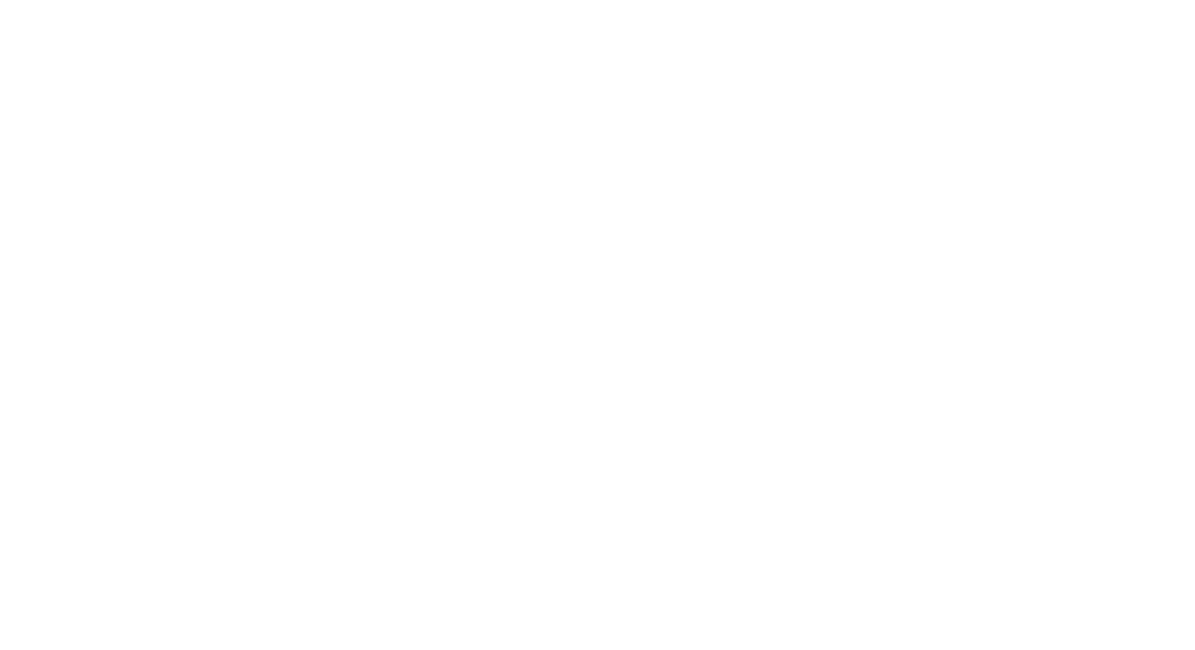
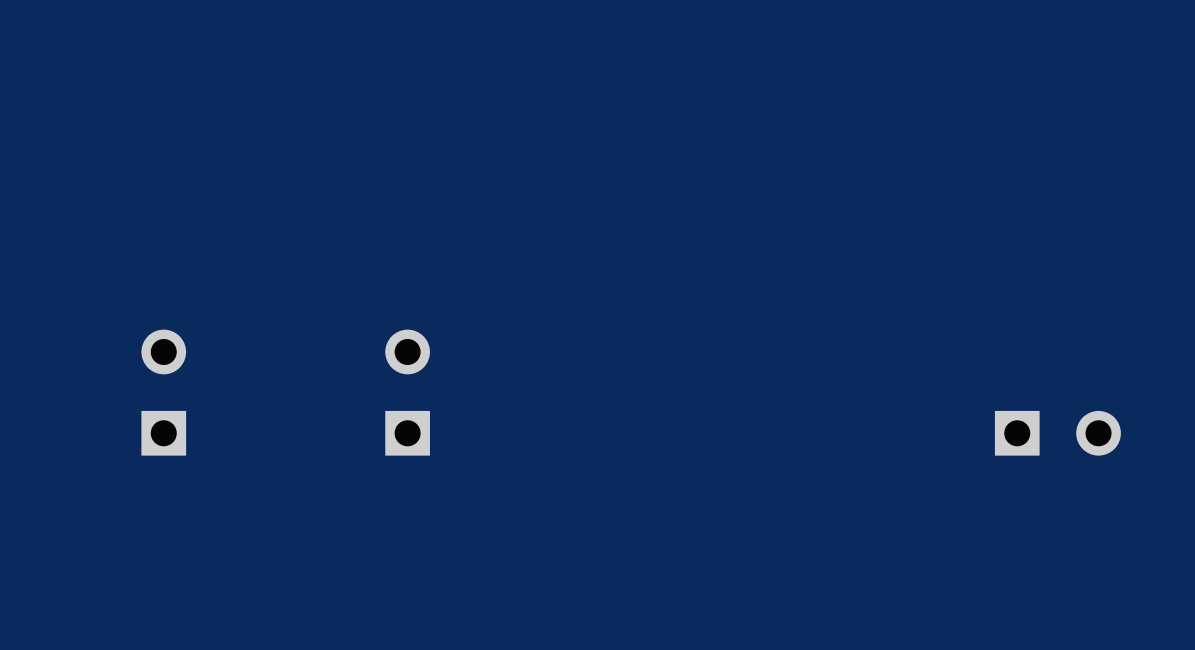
part: none -> (163, 392)
part: none -> (407, 392)
part: none -> (1057, 433)

